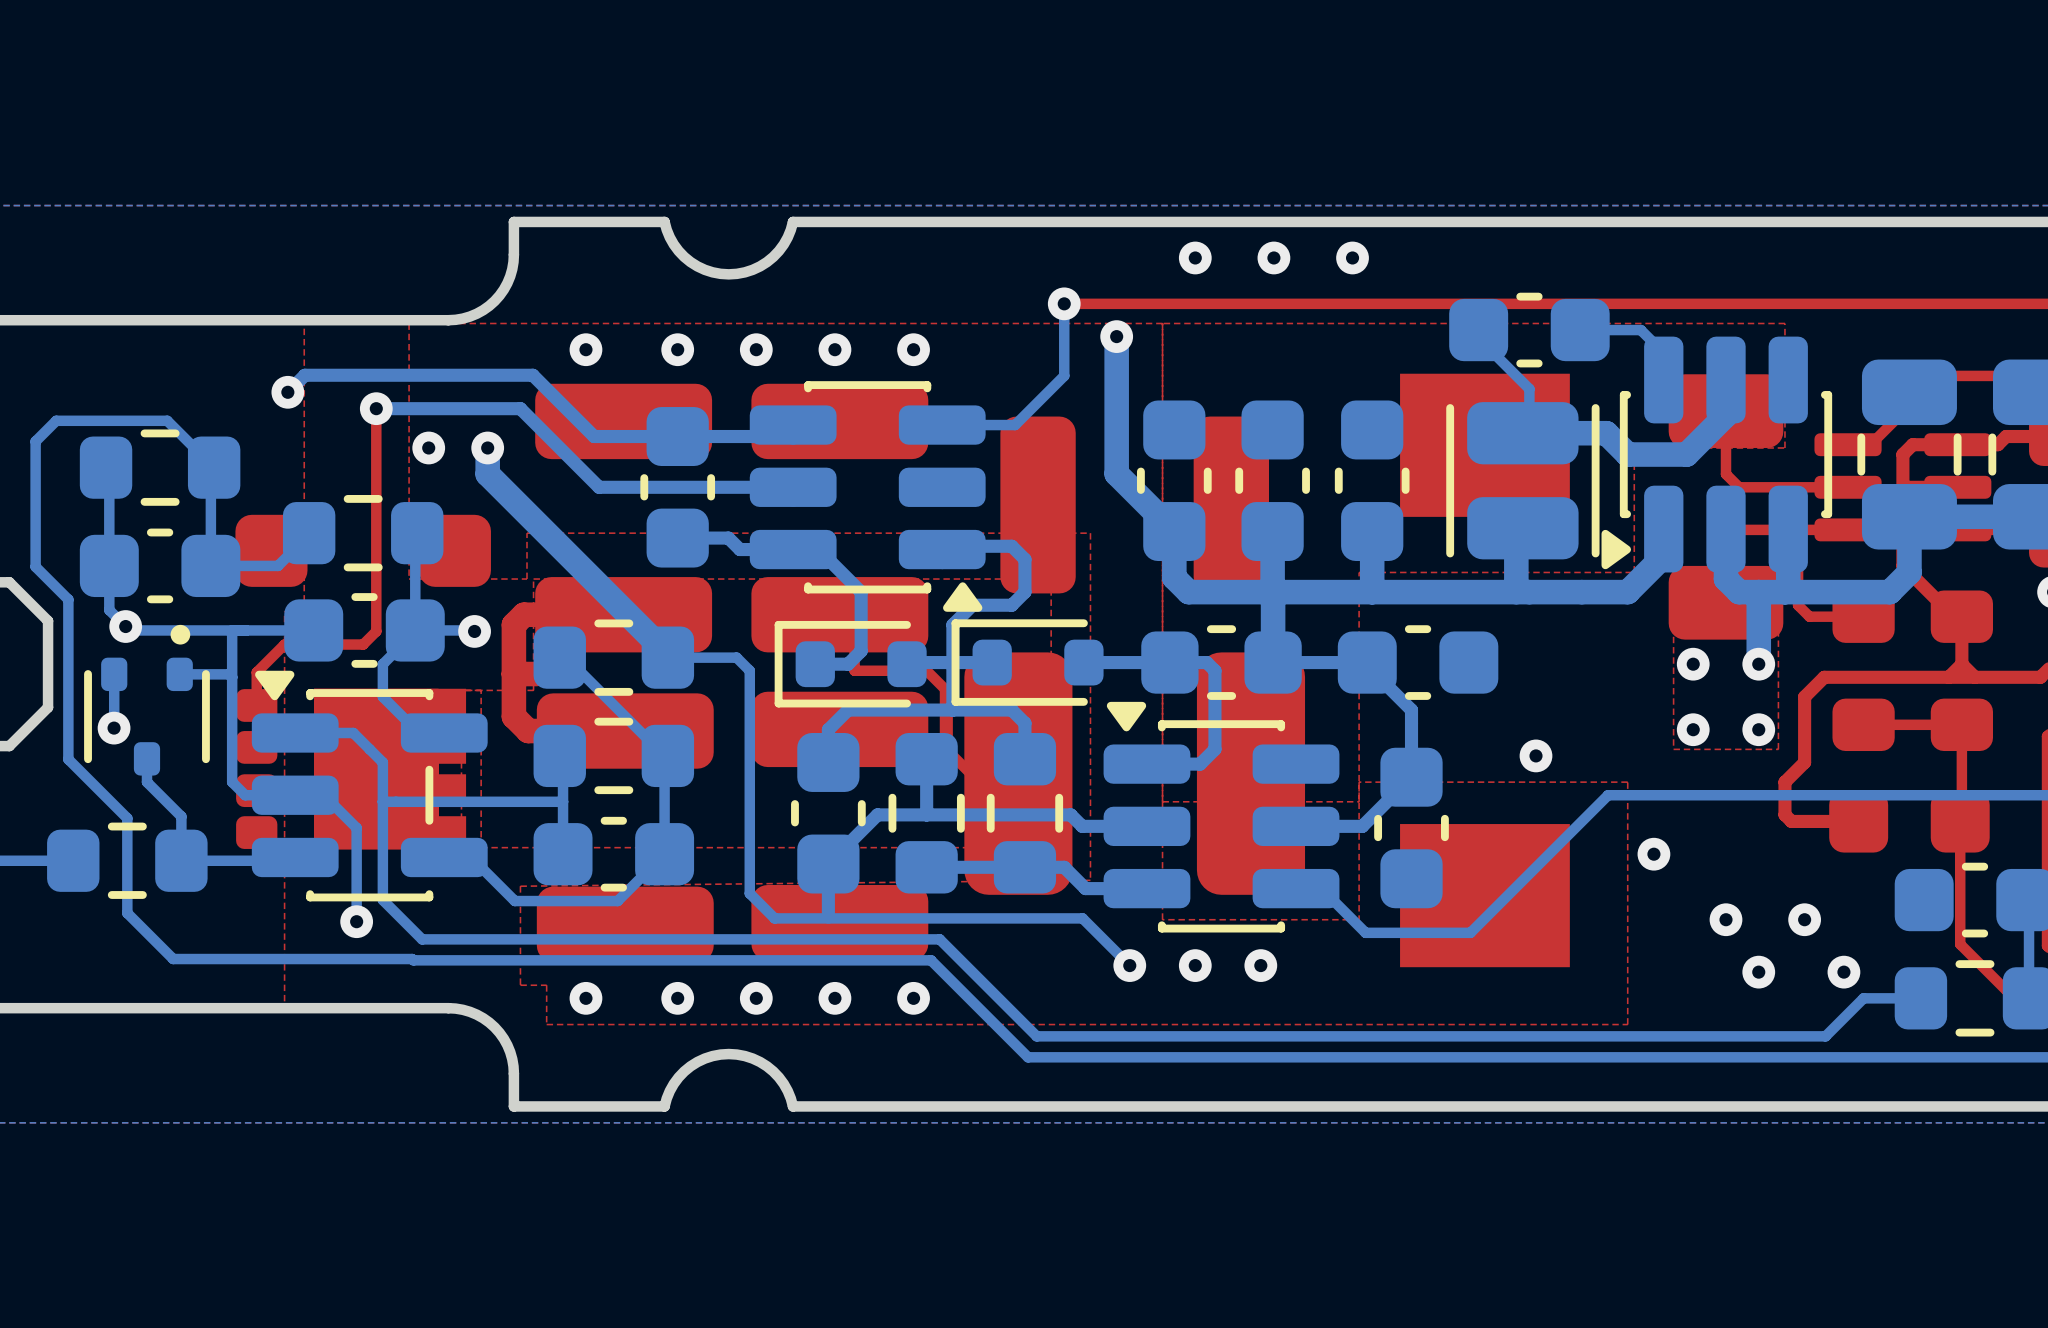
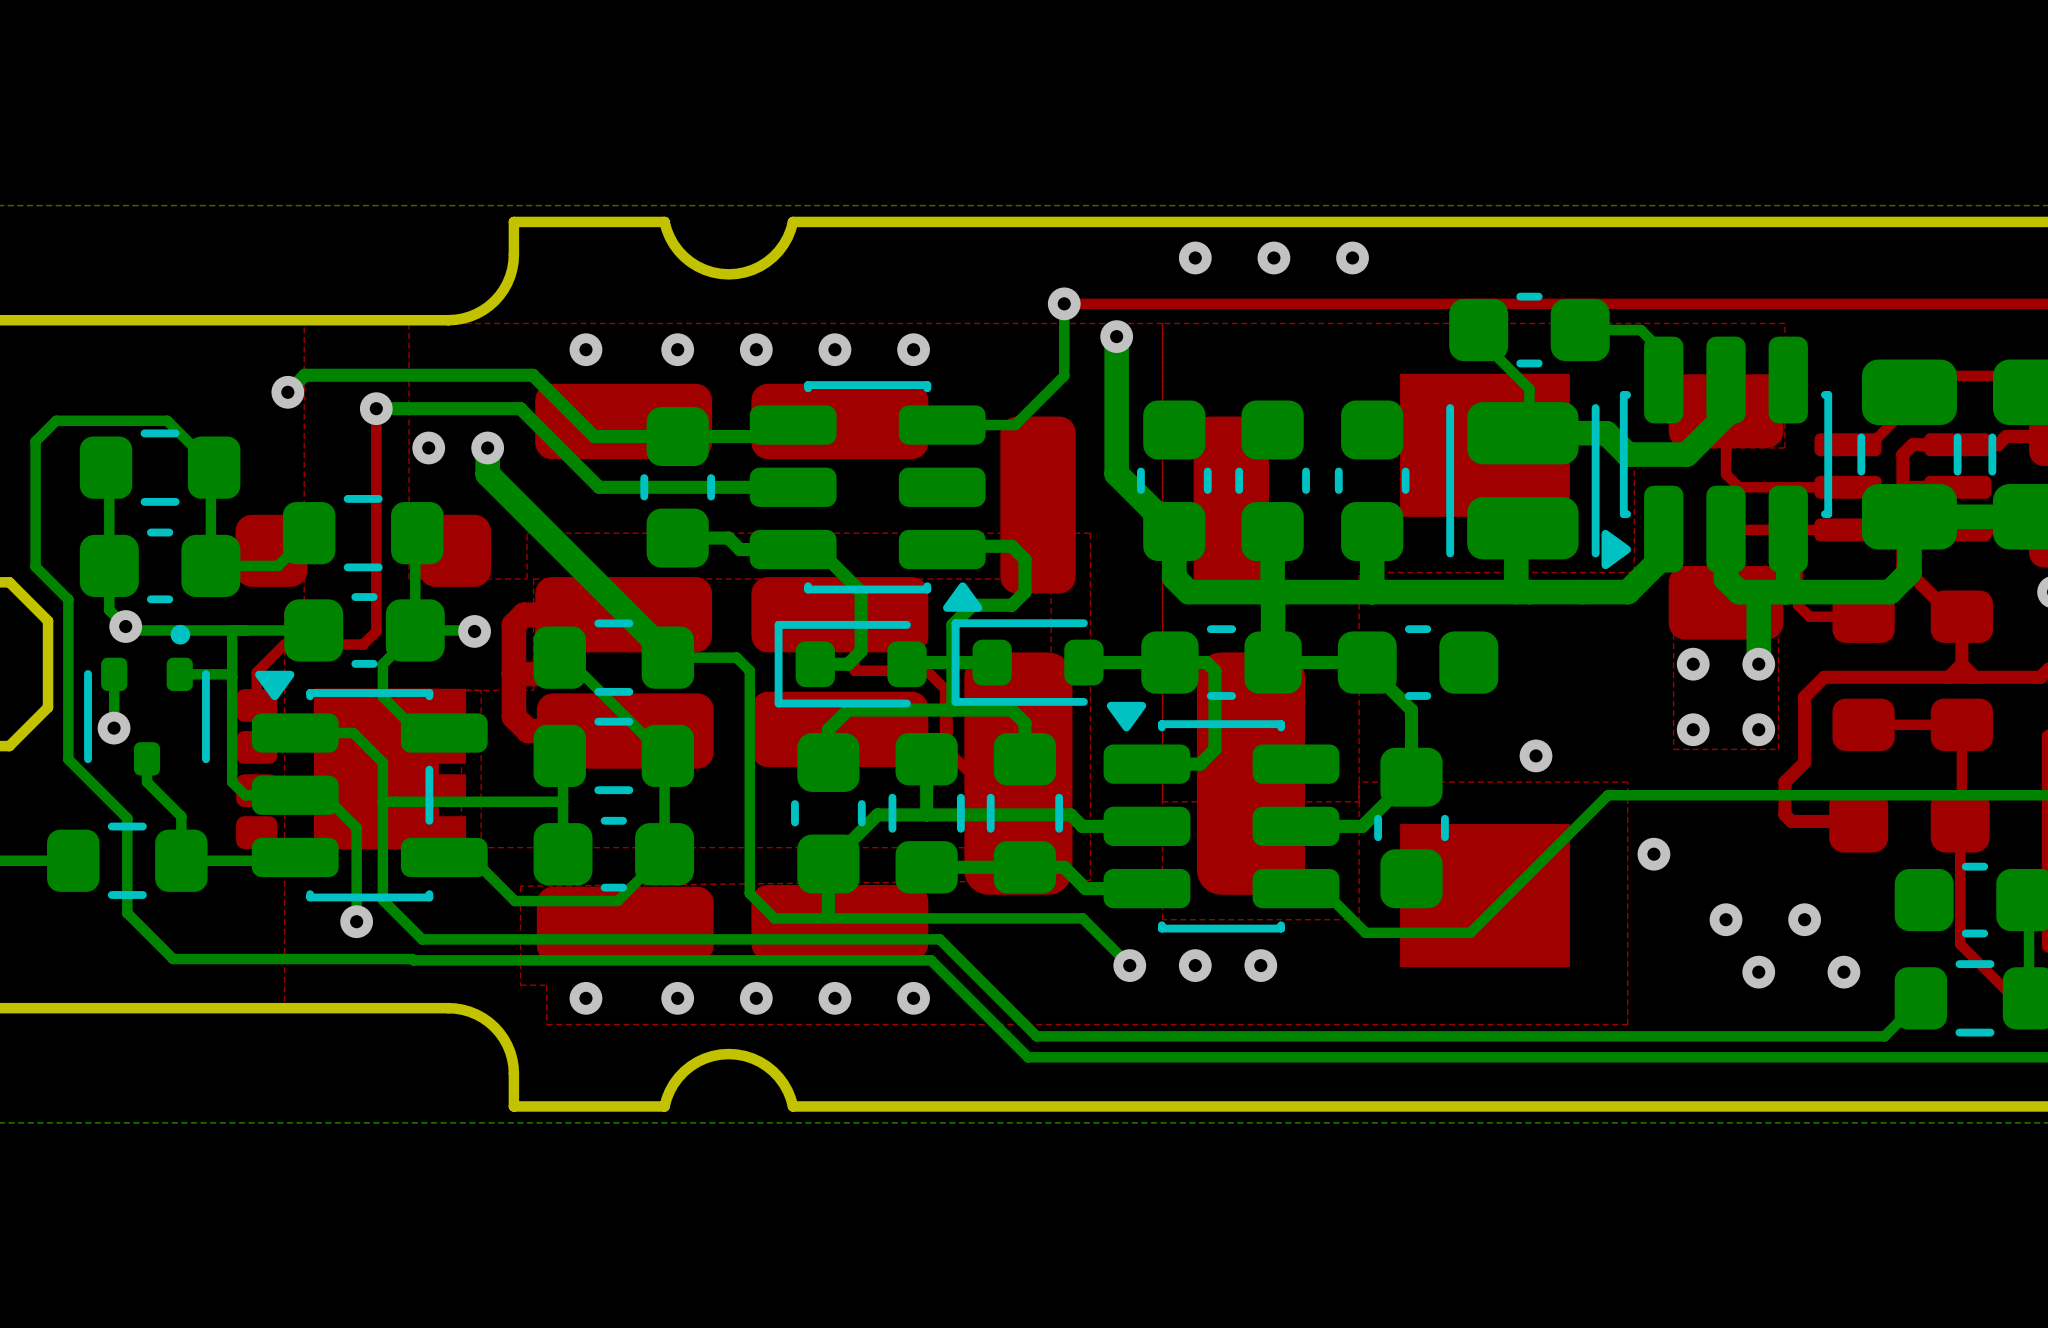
bottom track: (1920, 998) (1863, 998) (1825, 1036) -> (1920, 998) (1884, 1036) (1825, 1036)

